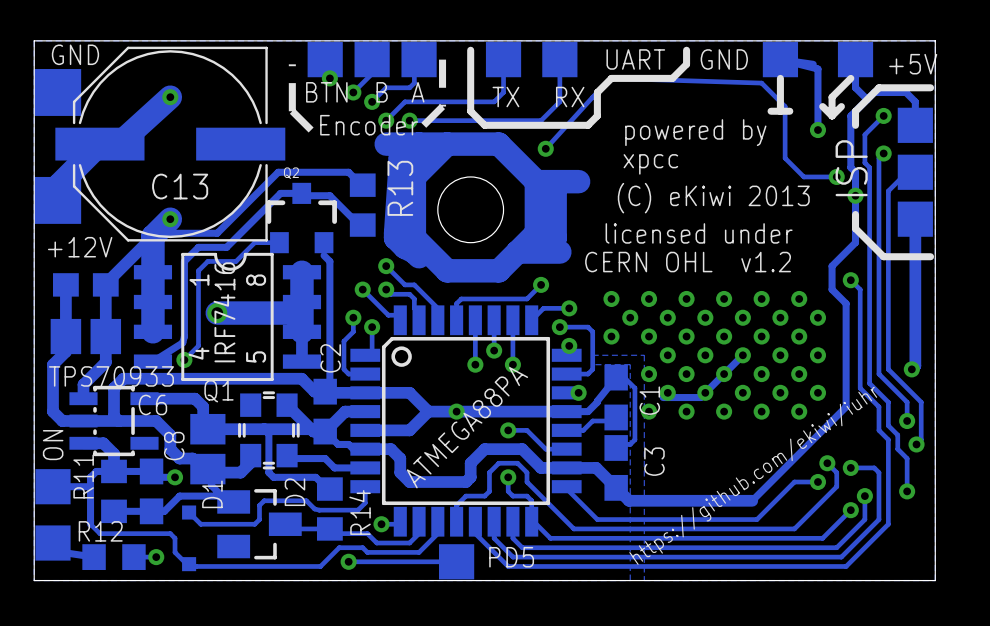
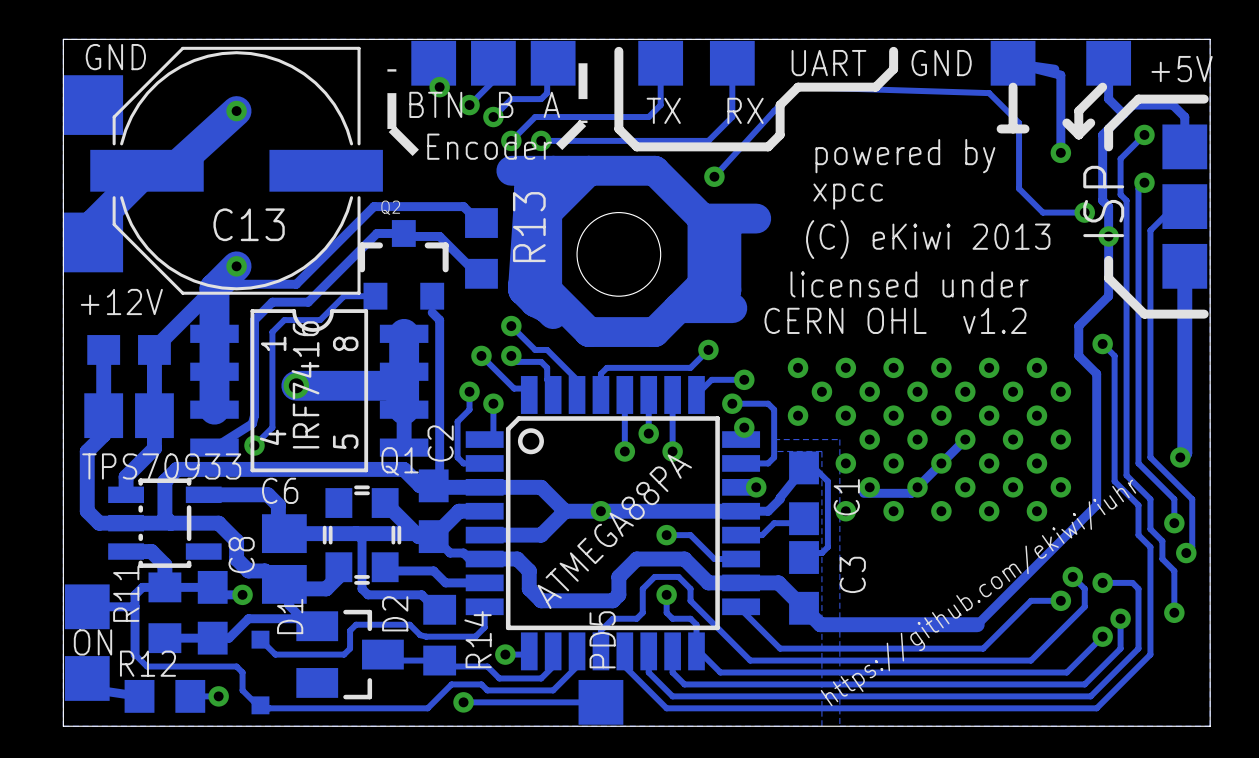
Q1 name position: Q1 (219, 391) -> Q1 (400, 461)
C6 name position: C6 (152, 404) -> C6 (280, 490)
text rotation: 0° (53, 445) -> 90° clockwise (92, 642)
text position: ON (53, 445) -> ON (92, 642)
PD5 name rotation: 0° (511, 557) -> 90° counterclockwise (602, 639)
PD5 name position: PD5 (511, 557) -> PD5 (602, 639)

